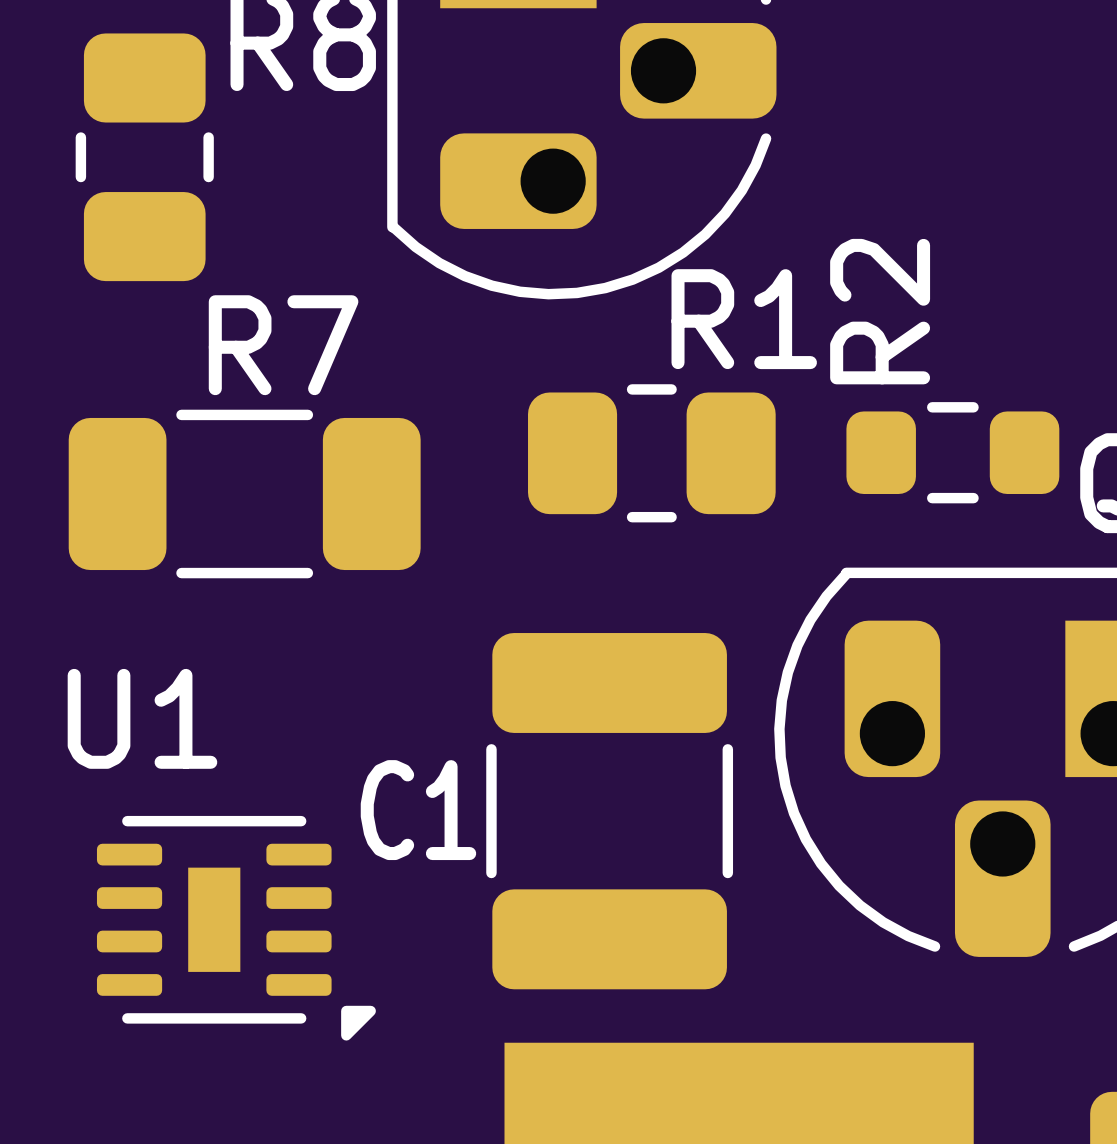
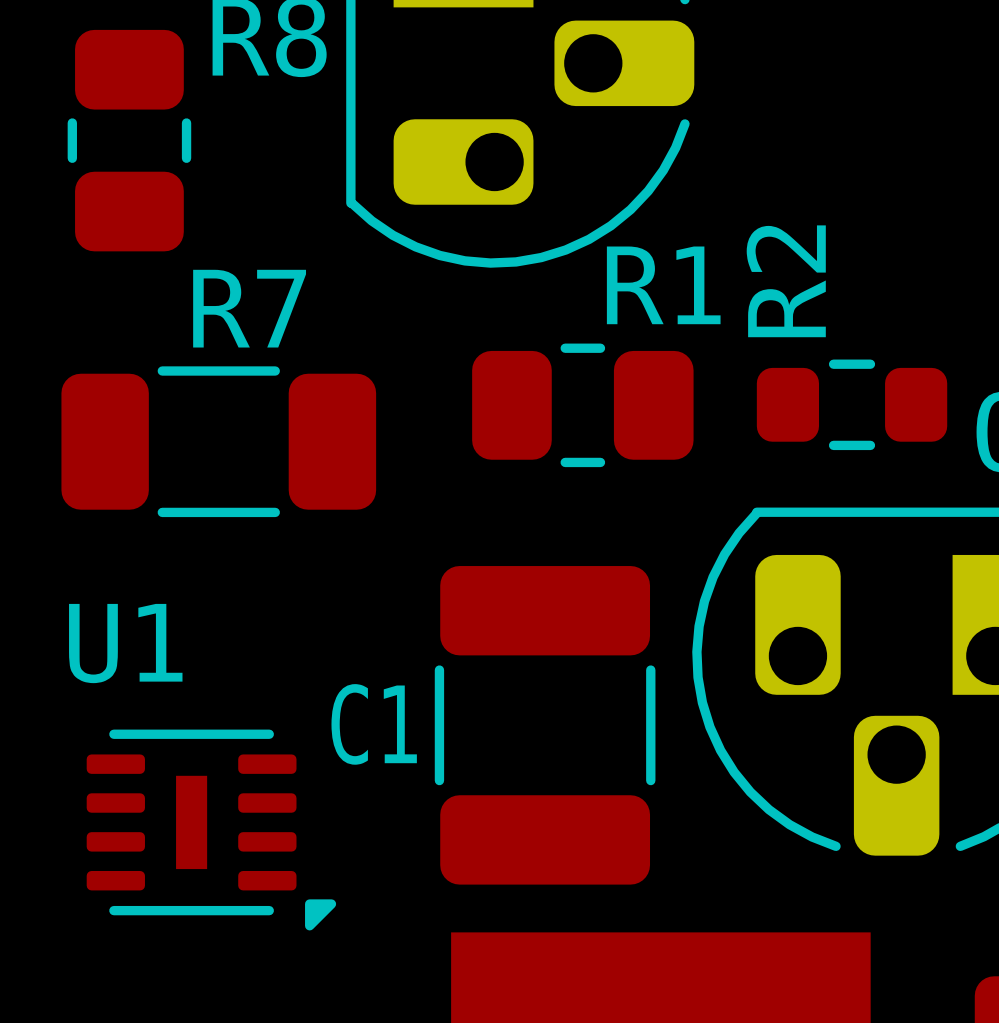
U1 footprint: [96, 815, 376, 1041] -> [86, 729, 337, 931]

